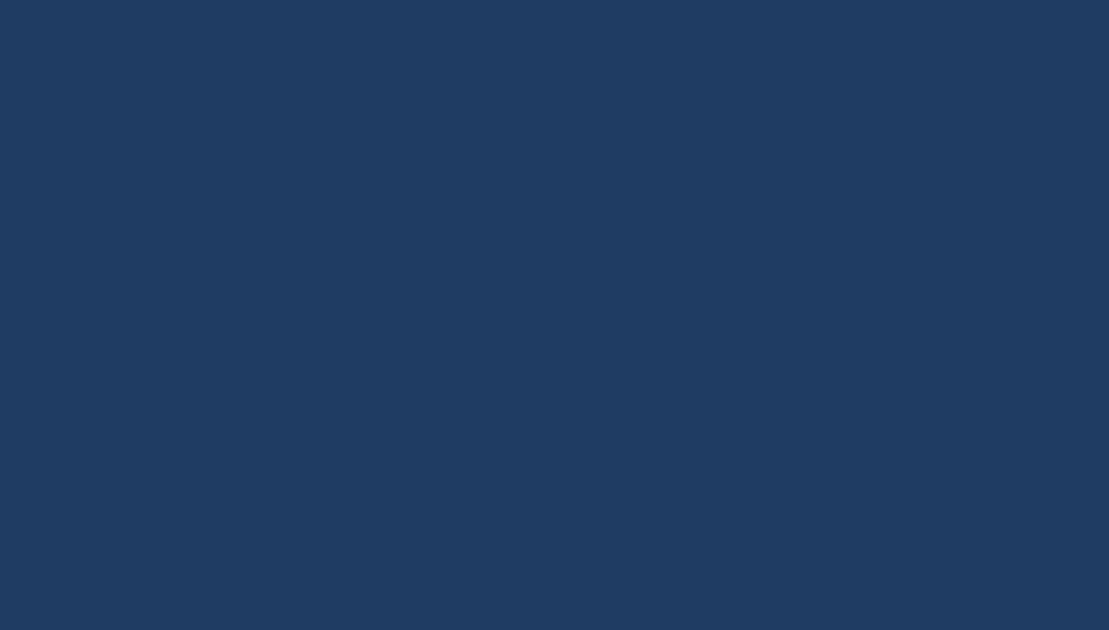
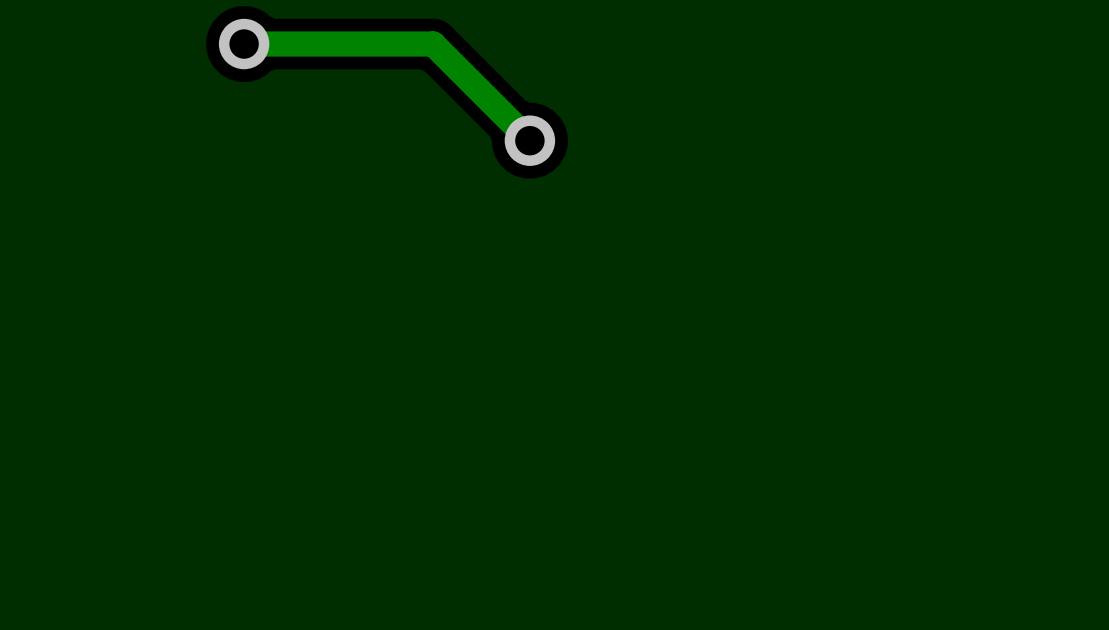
track: none -> (244, 44) (433, 44) (529, 140)
via: none -> (244, 44)
via: none -> (529, 140)

